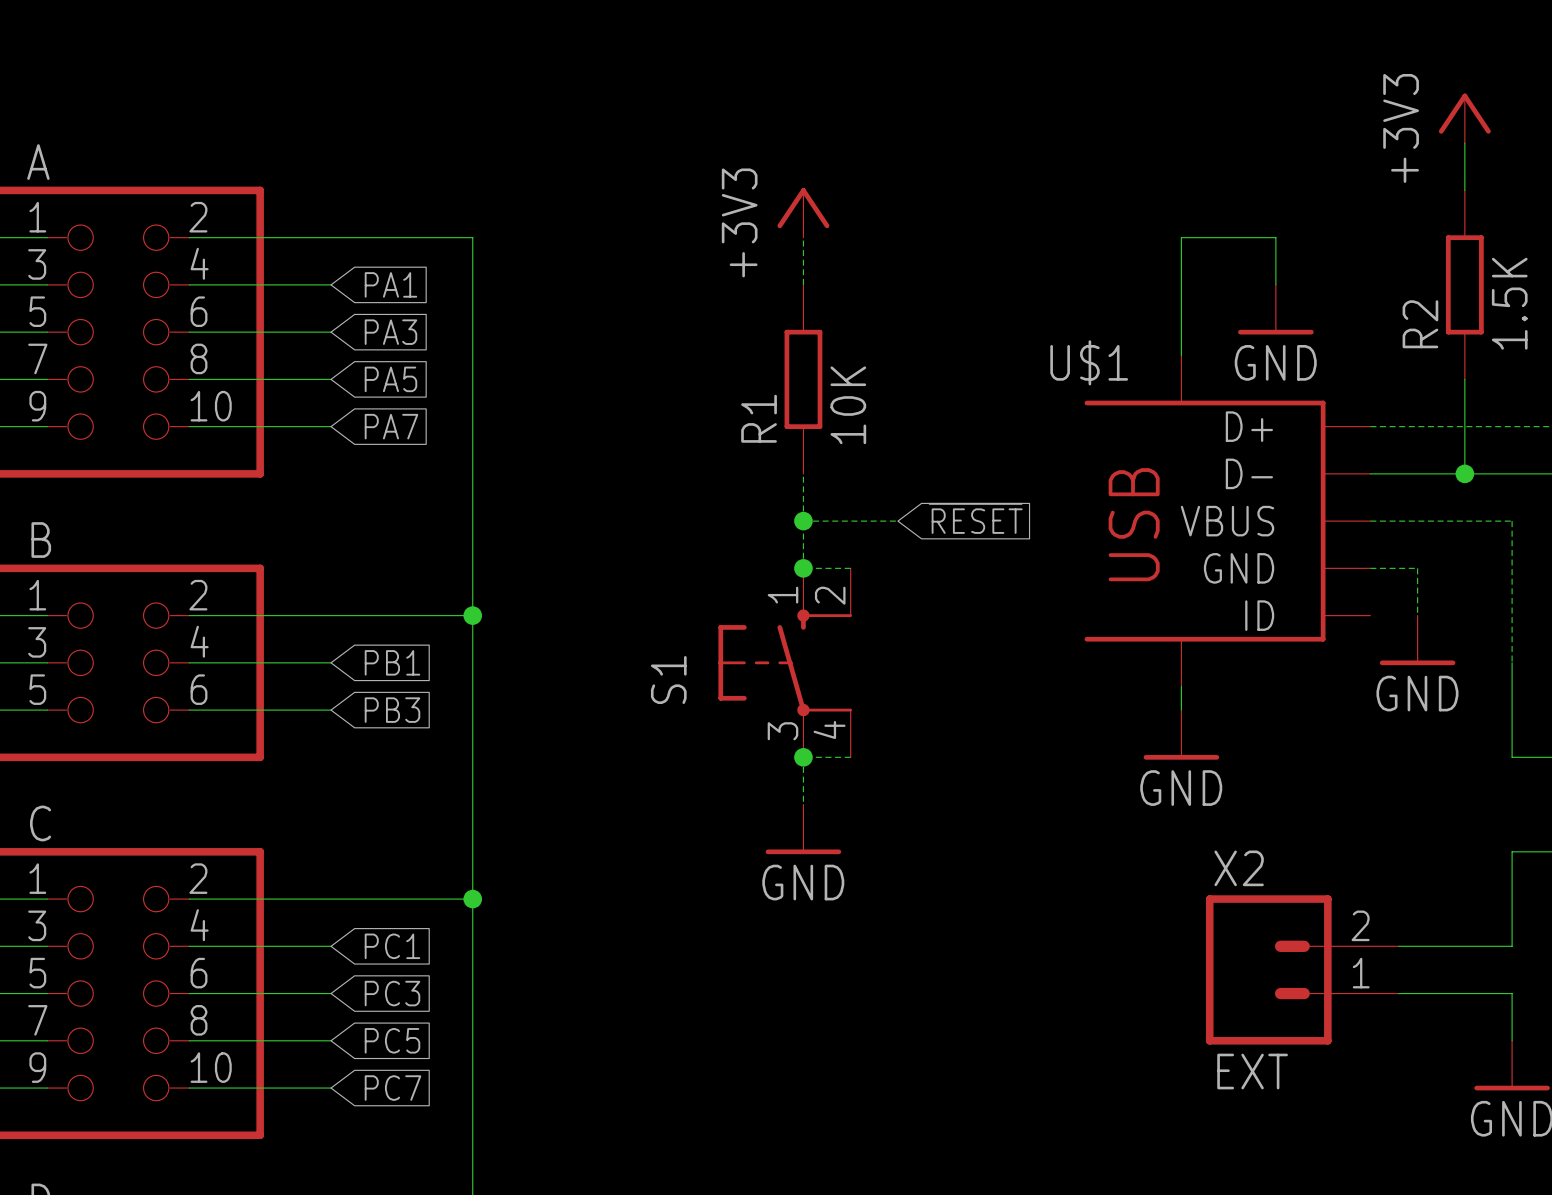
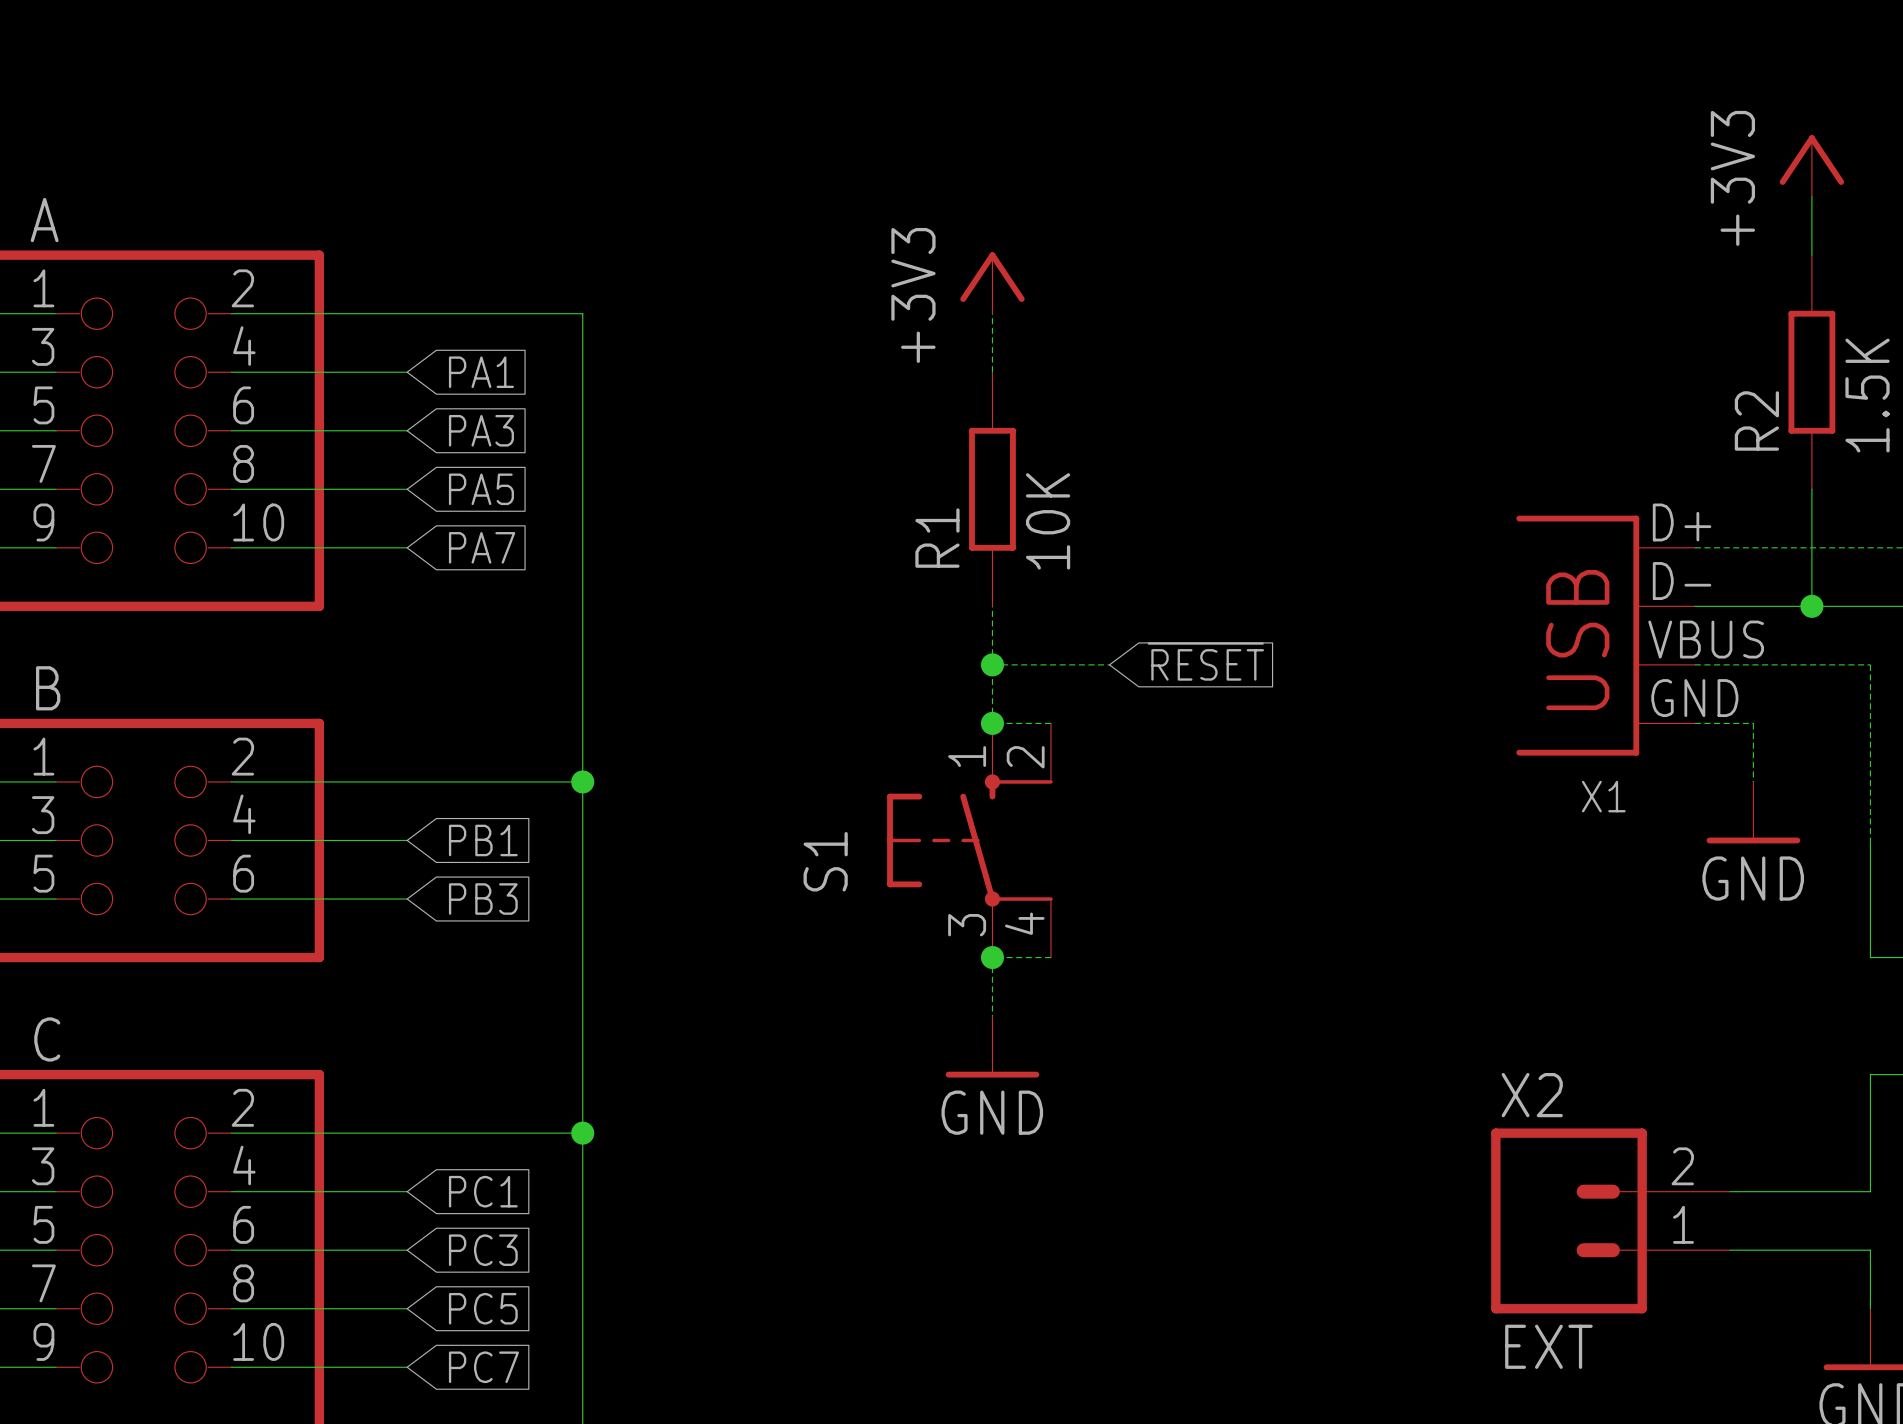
wire: (1275, 284) (1275, 237) (1181, 237) (1181, 355) -> none
power symbol: GND (1275, 309) -> none
X1: none -> (1605, 635)
U$1: (1227, 521) -> none
wire: (1181, 686) (1181, 710) -> none
power symbol: GND (1181, 734) -> none

